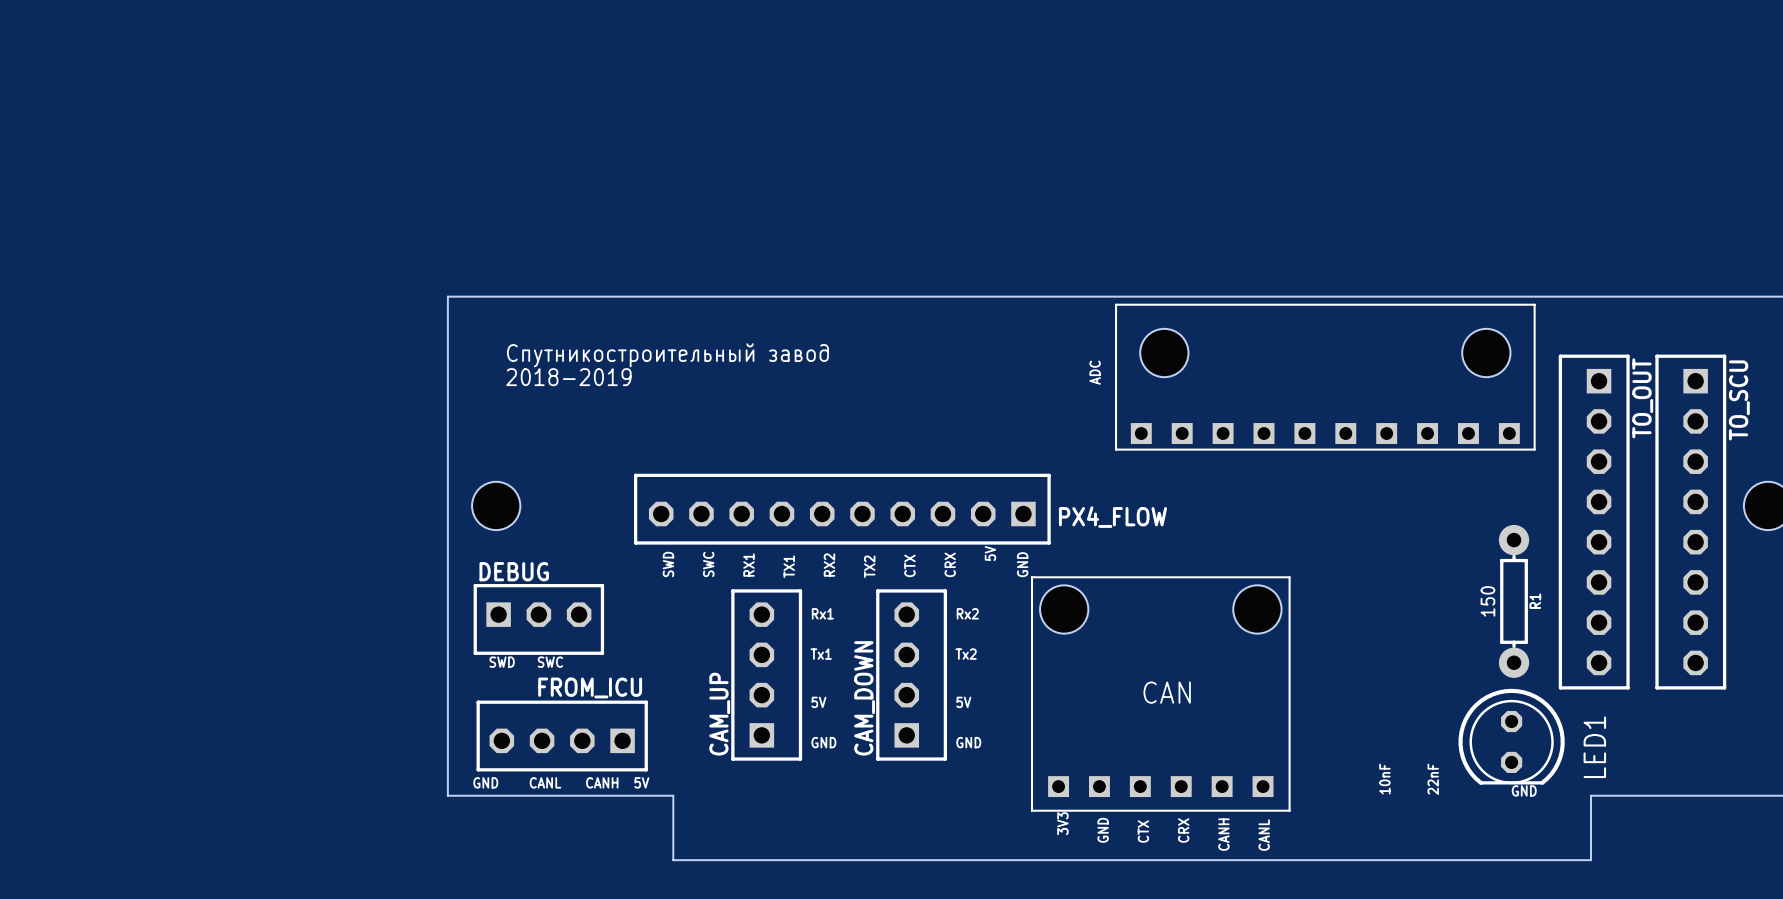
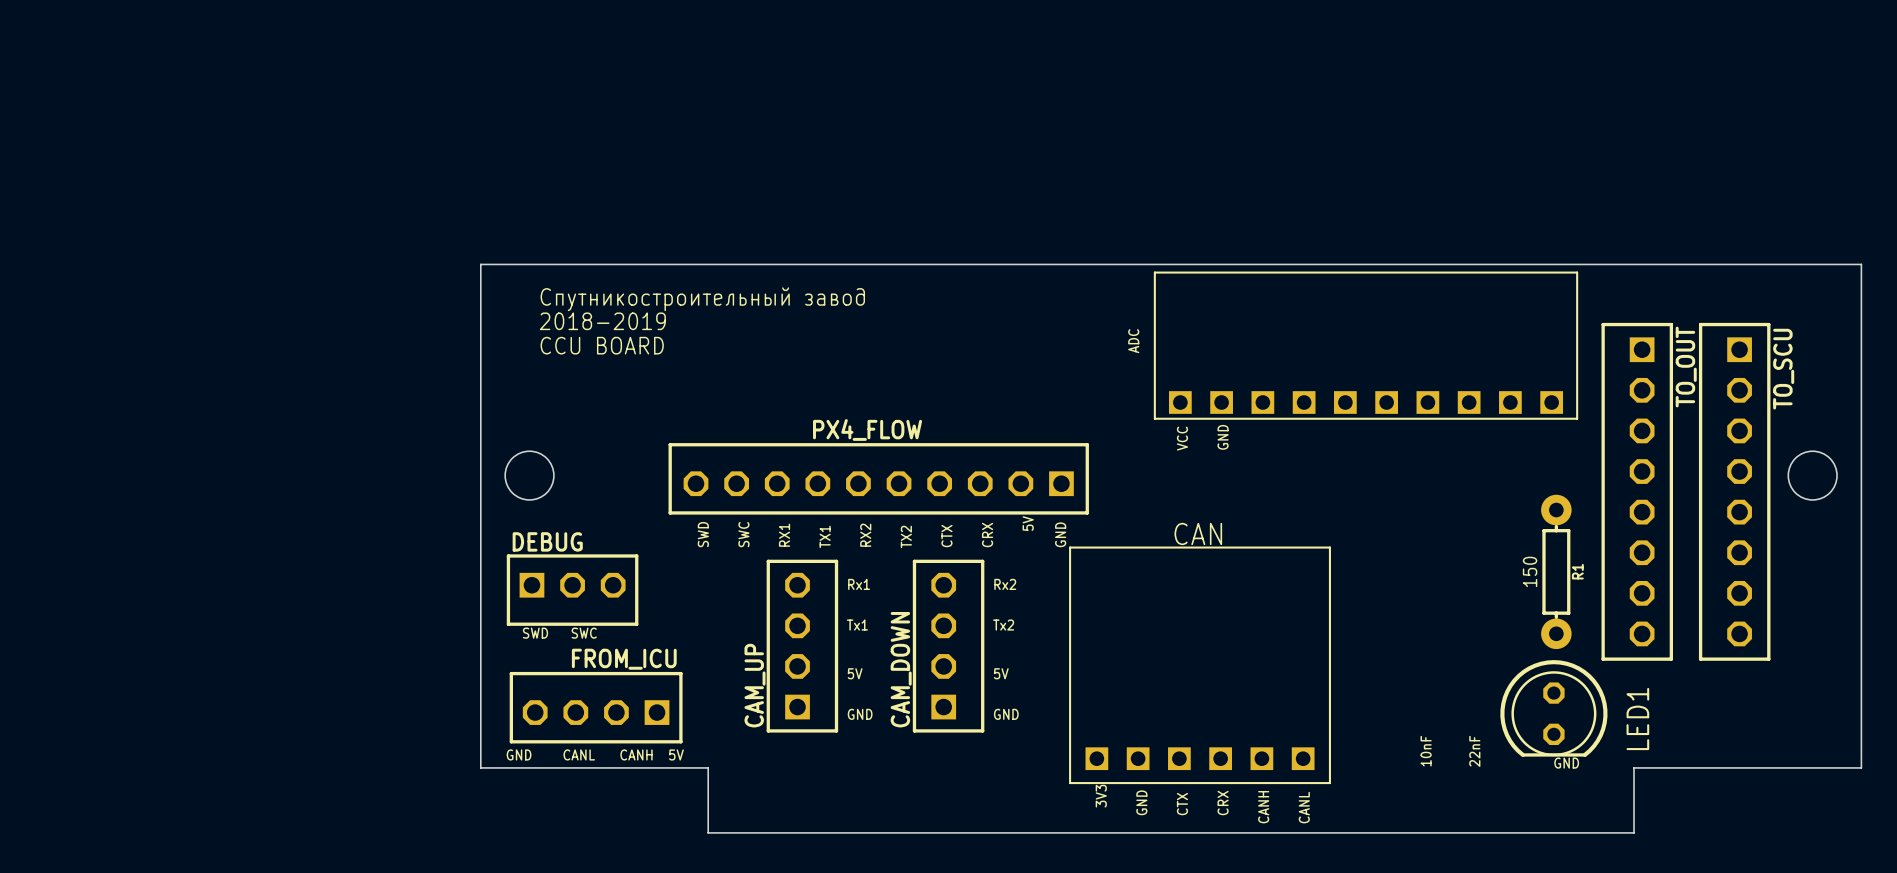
part footprint: [1115, 303, 1536, 451] -> [1153, 271, 1579, 420]
text: none -> Спутникостроительный завод (702, 299)
text: Спутникостроительный завод (667, 355) -> 2018-2019 (602, 321)
text: 2018-2019 (568, 377) -> CCU BOARD (602, 345)
text: none -> GND (1223, 437)
text: none -> VCC (1182, 438)
PX4_FLOW name position: PX4_FLOW (1112, 517) -> PX4_FLOW (867, 429)
CAN footprint: [1030, 576, 1291, 812] -> [1069, 546, 1331, 785]
CAN name position: CAN (1167, 692) -> CAN (1198, 533)

